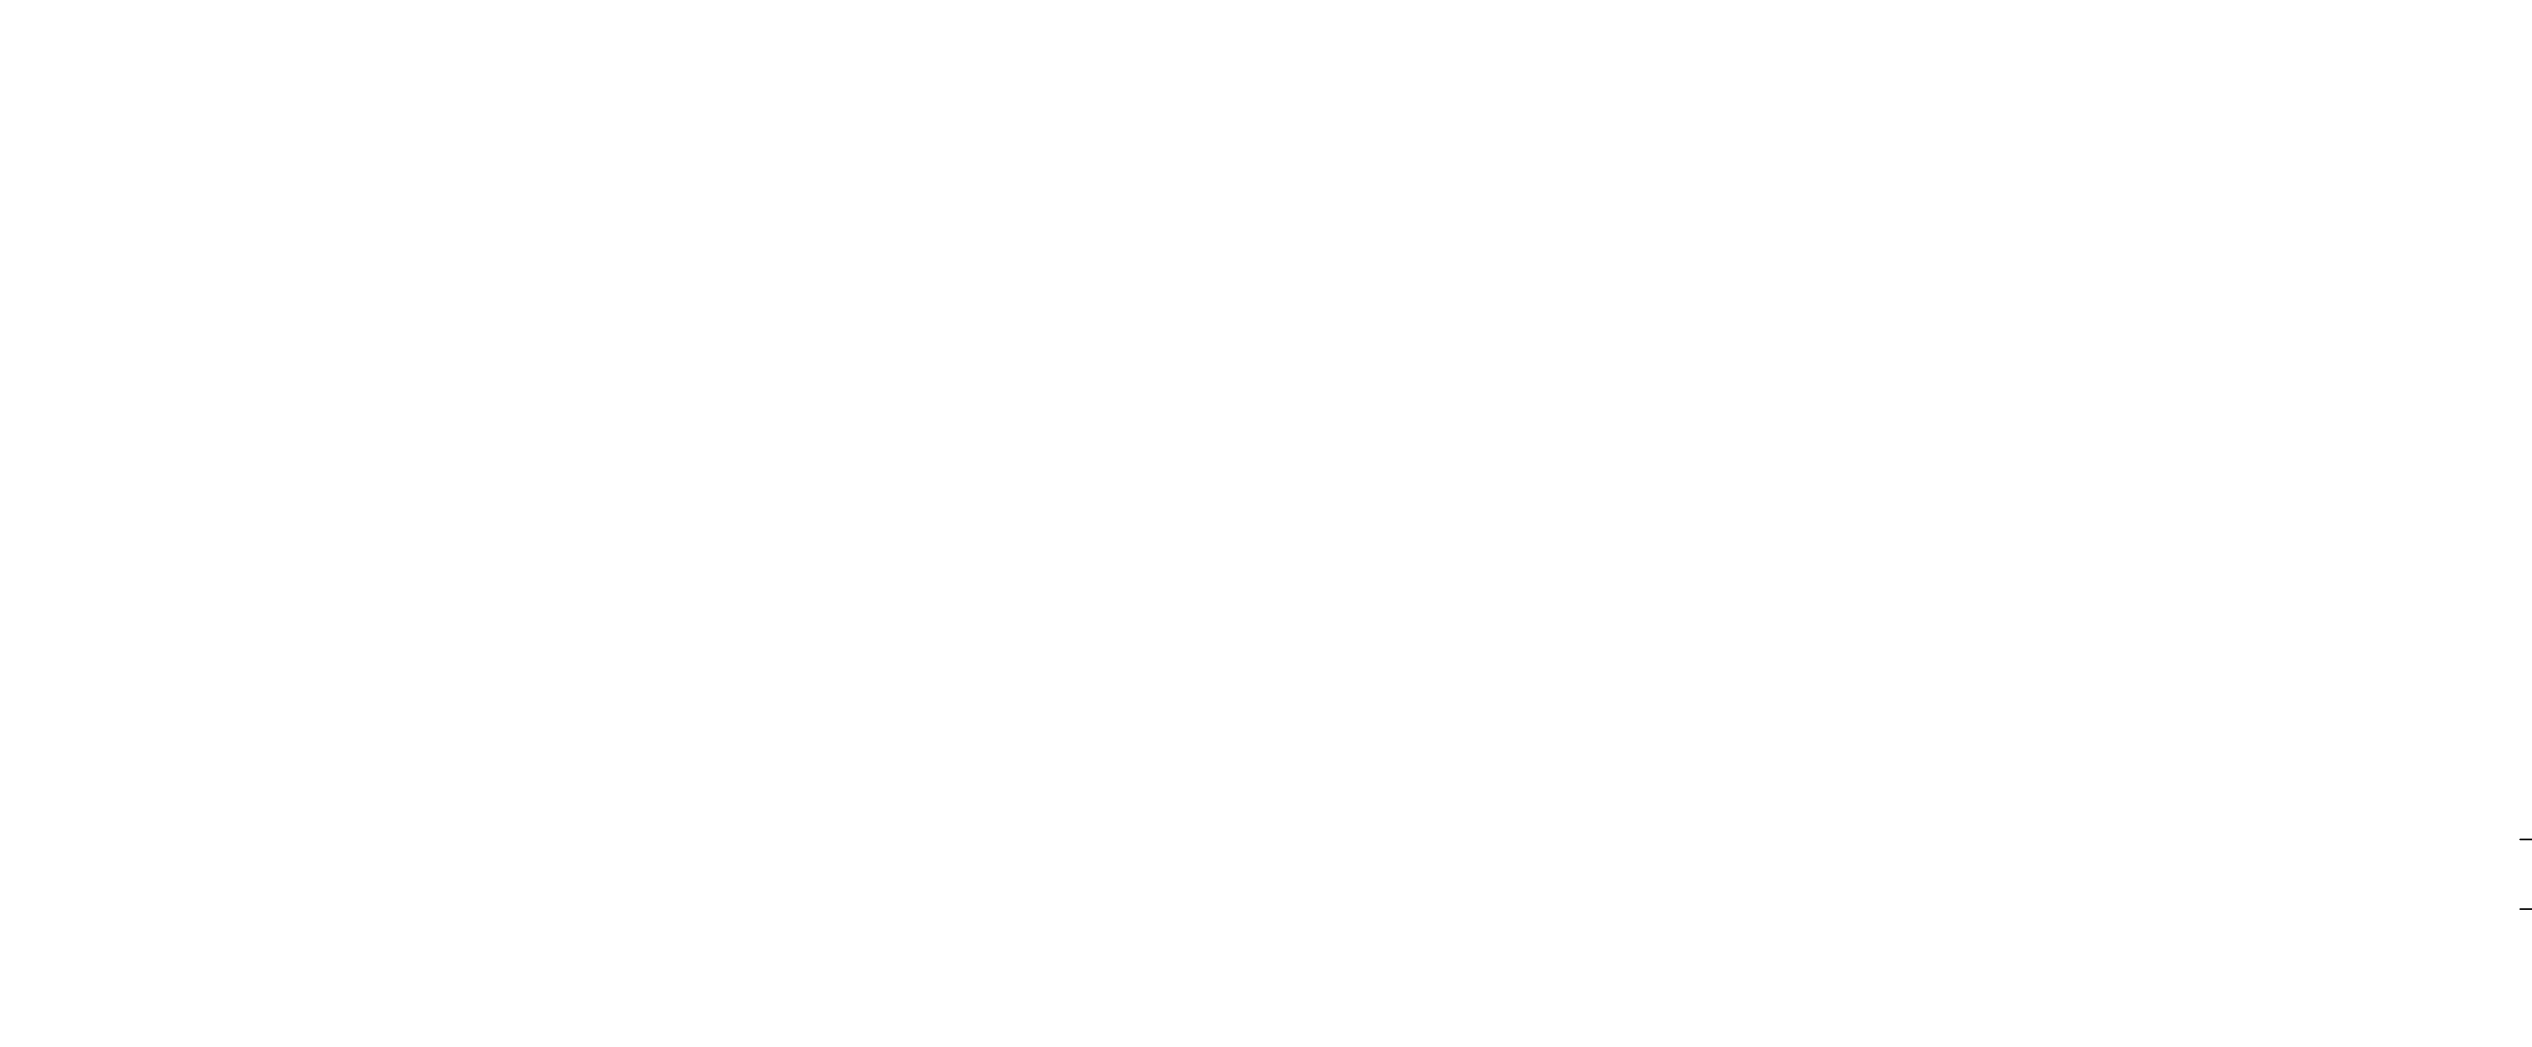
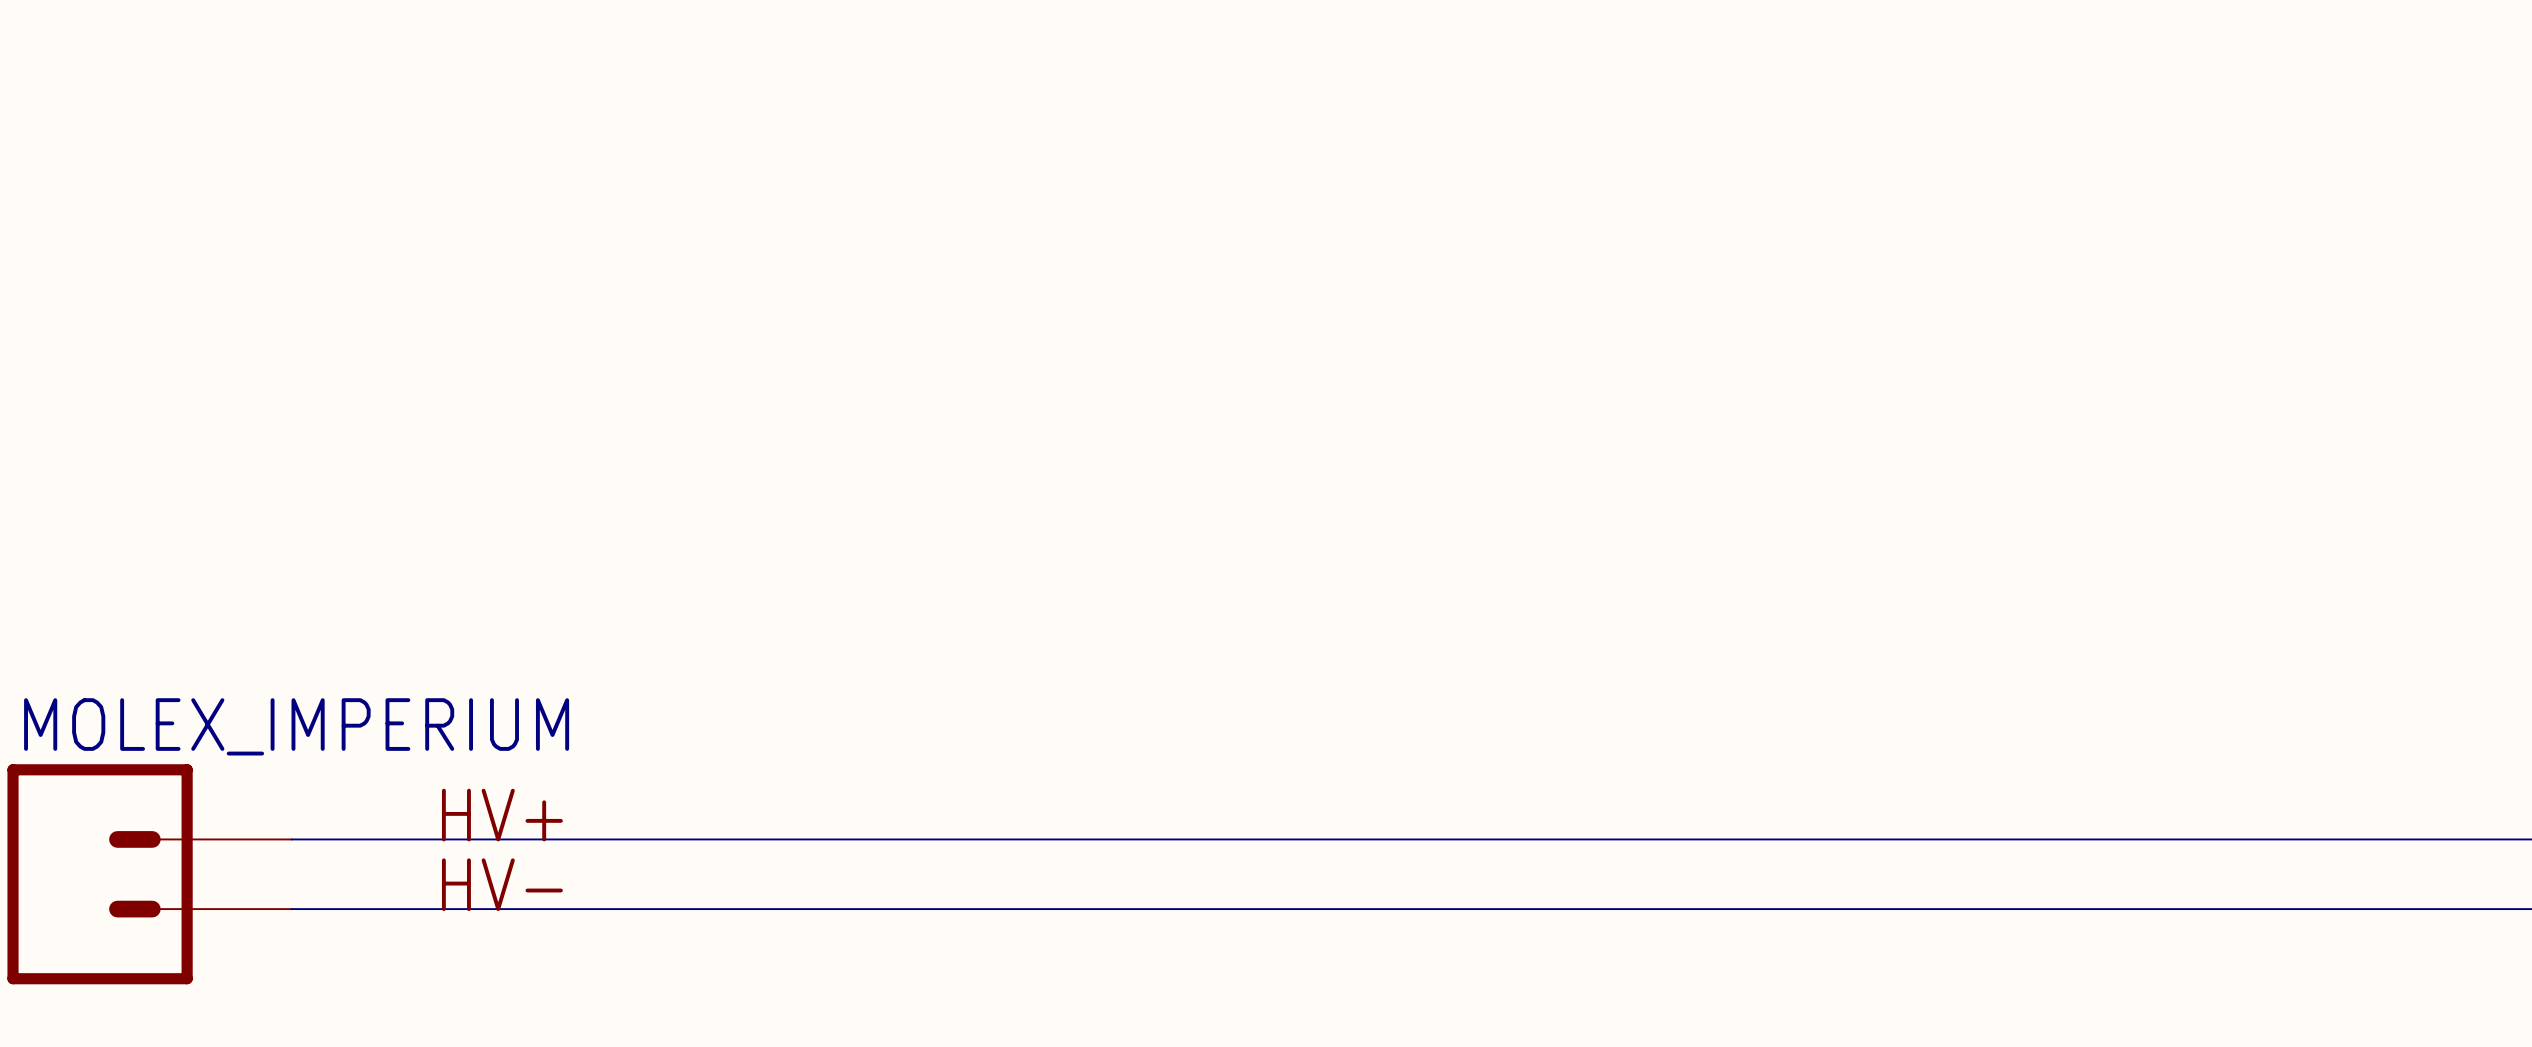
label: none -> HV+ (502, 815)
wire: none -> (291, 839) (2520, 839)
MOLEX_IMPERIUM: none -> (149, 874)
label: none -> HV- (502, 884)
wire: none -> (291, 909) (2520, 909)

